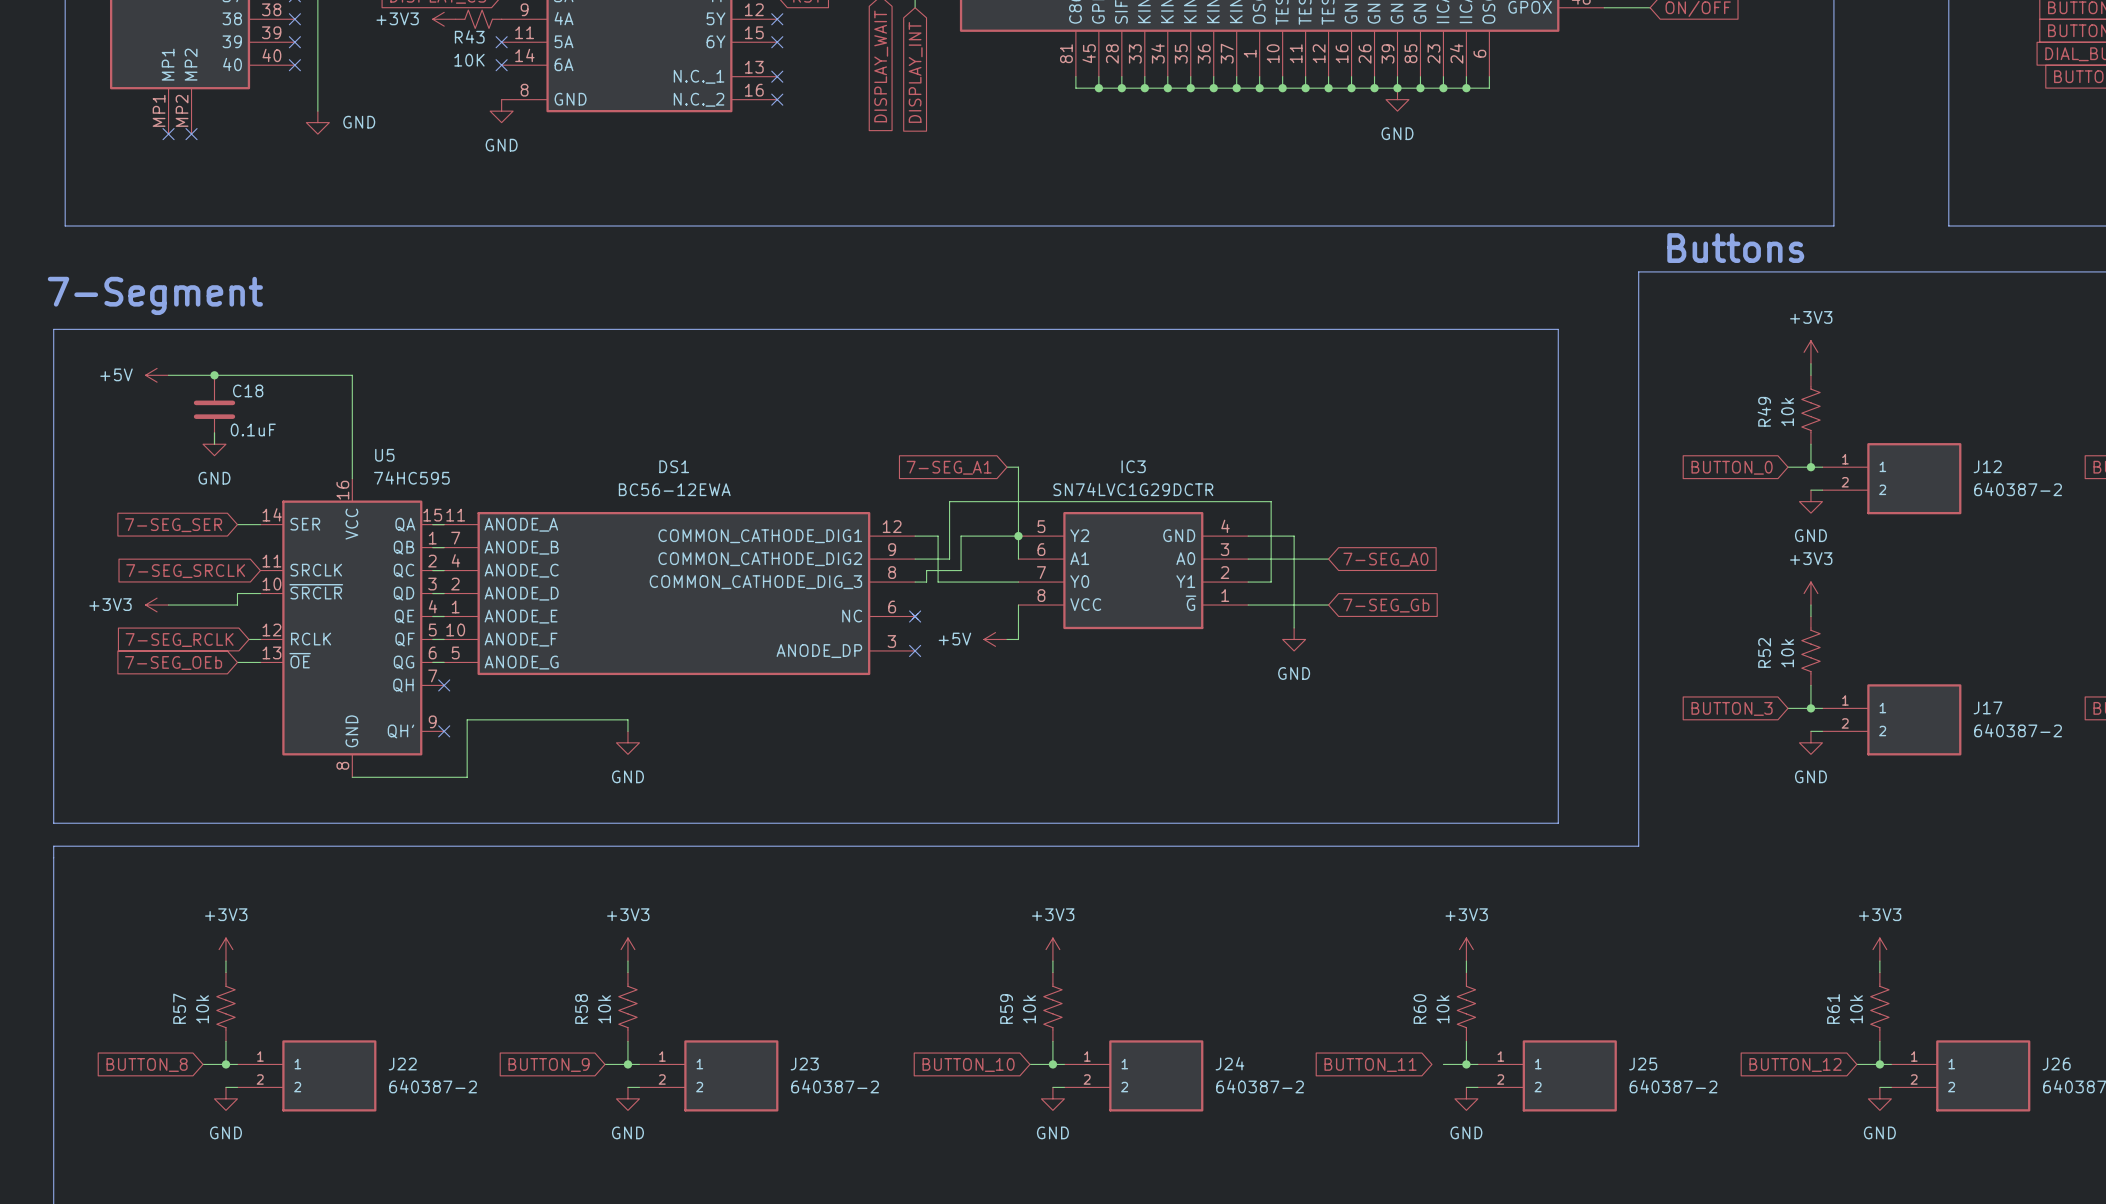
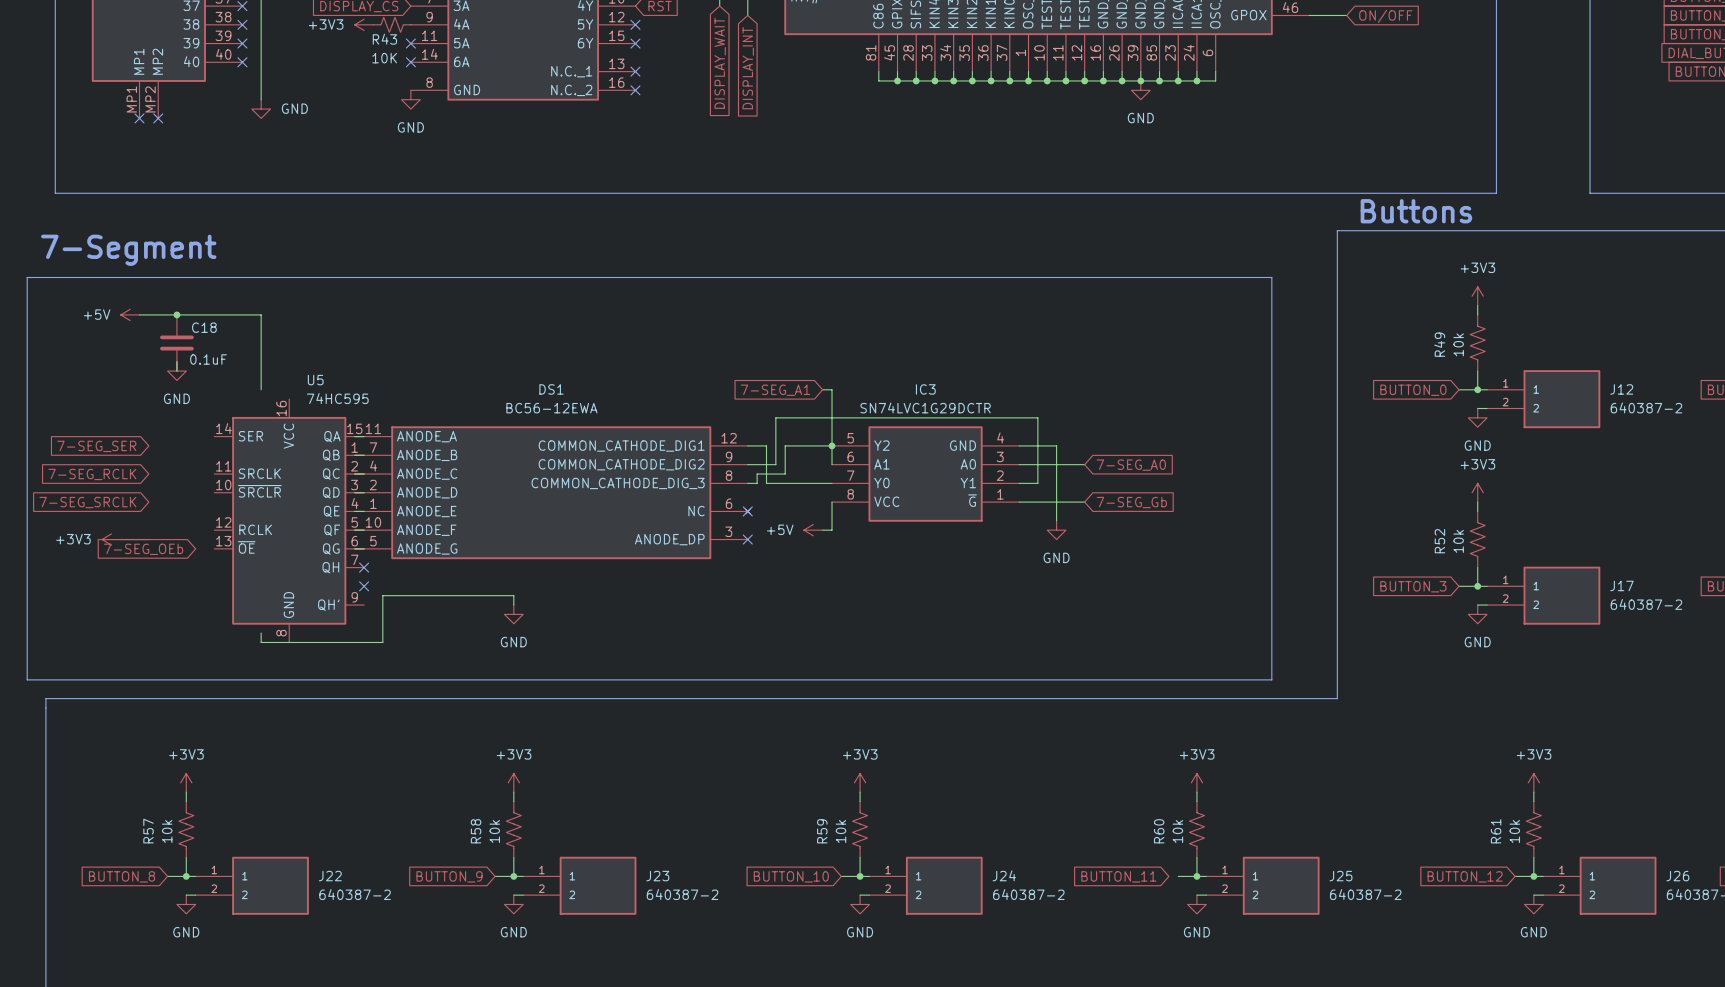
line: (53, 329) (53, 823) -> (45, 277) (27, 277) (27, 679) (45, 679)
wire: (317, 375) (352, 375) (352, 478) -> (261, 314) (261, 389)
wire: (237, 524) (260, 524) -> none
global label position: 7-SEG_SER (173, 525) -> 7-SEG_SER (96, 446)
global label position: 7-SEG_SRCLK (185, 571) -> 7-SEG_SRCLK (87, 502)
wire: (260, 593) (237, 593) (237, 605) (168, 605) -> none
power symbol position: +3V3 (157, 605) -> +3V3 (111, 539)
wire: (248, 639) (260, 639) -> none
global label position: 7-SEG_RCLK (179, 640) -> 7-SEG_RCLK (92, 474)
wire: (237, 662) (260, 662) -> none
no-connect mark position: (444, 731) -> (364, 586)
wire: none -> (261, 633) (261, 642) (289, 642)

